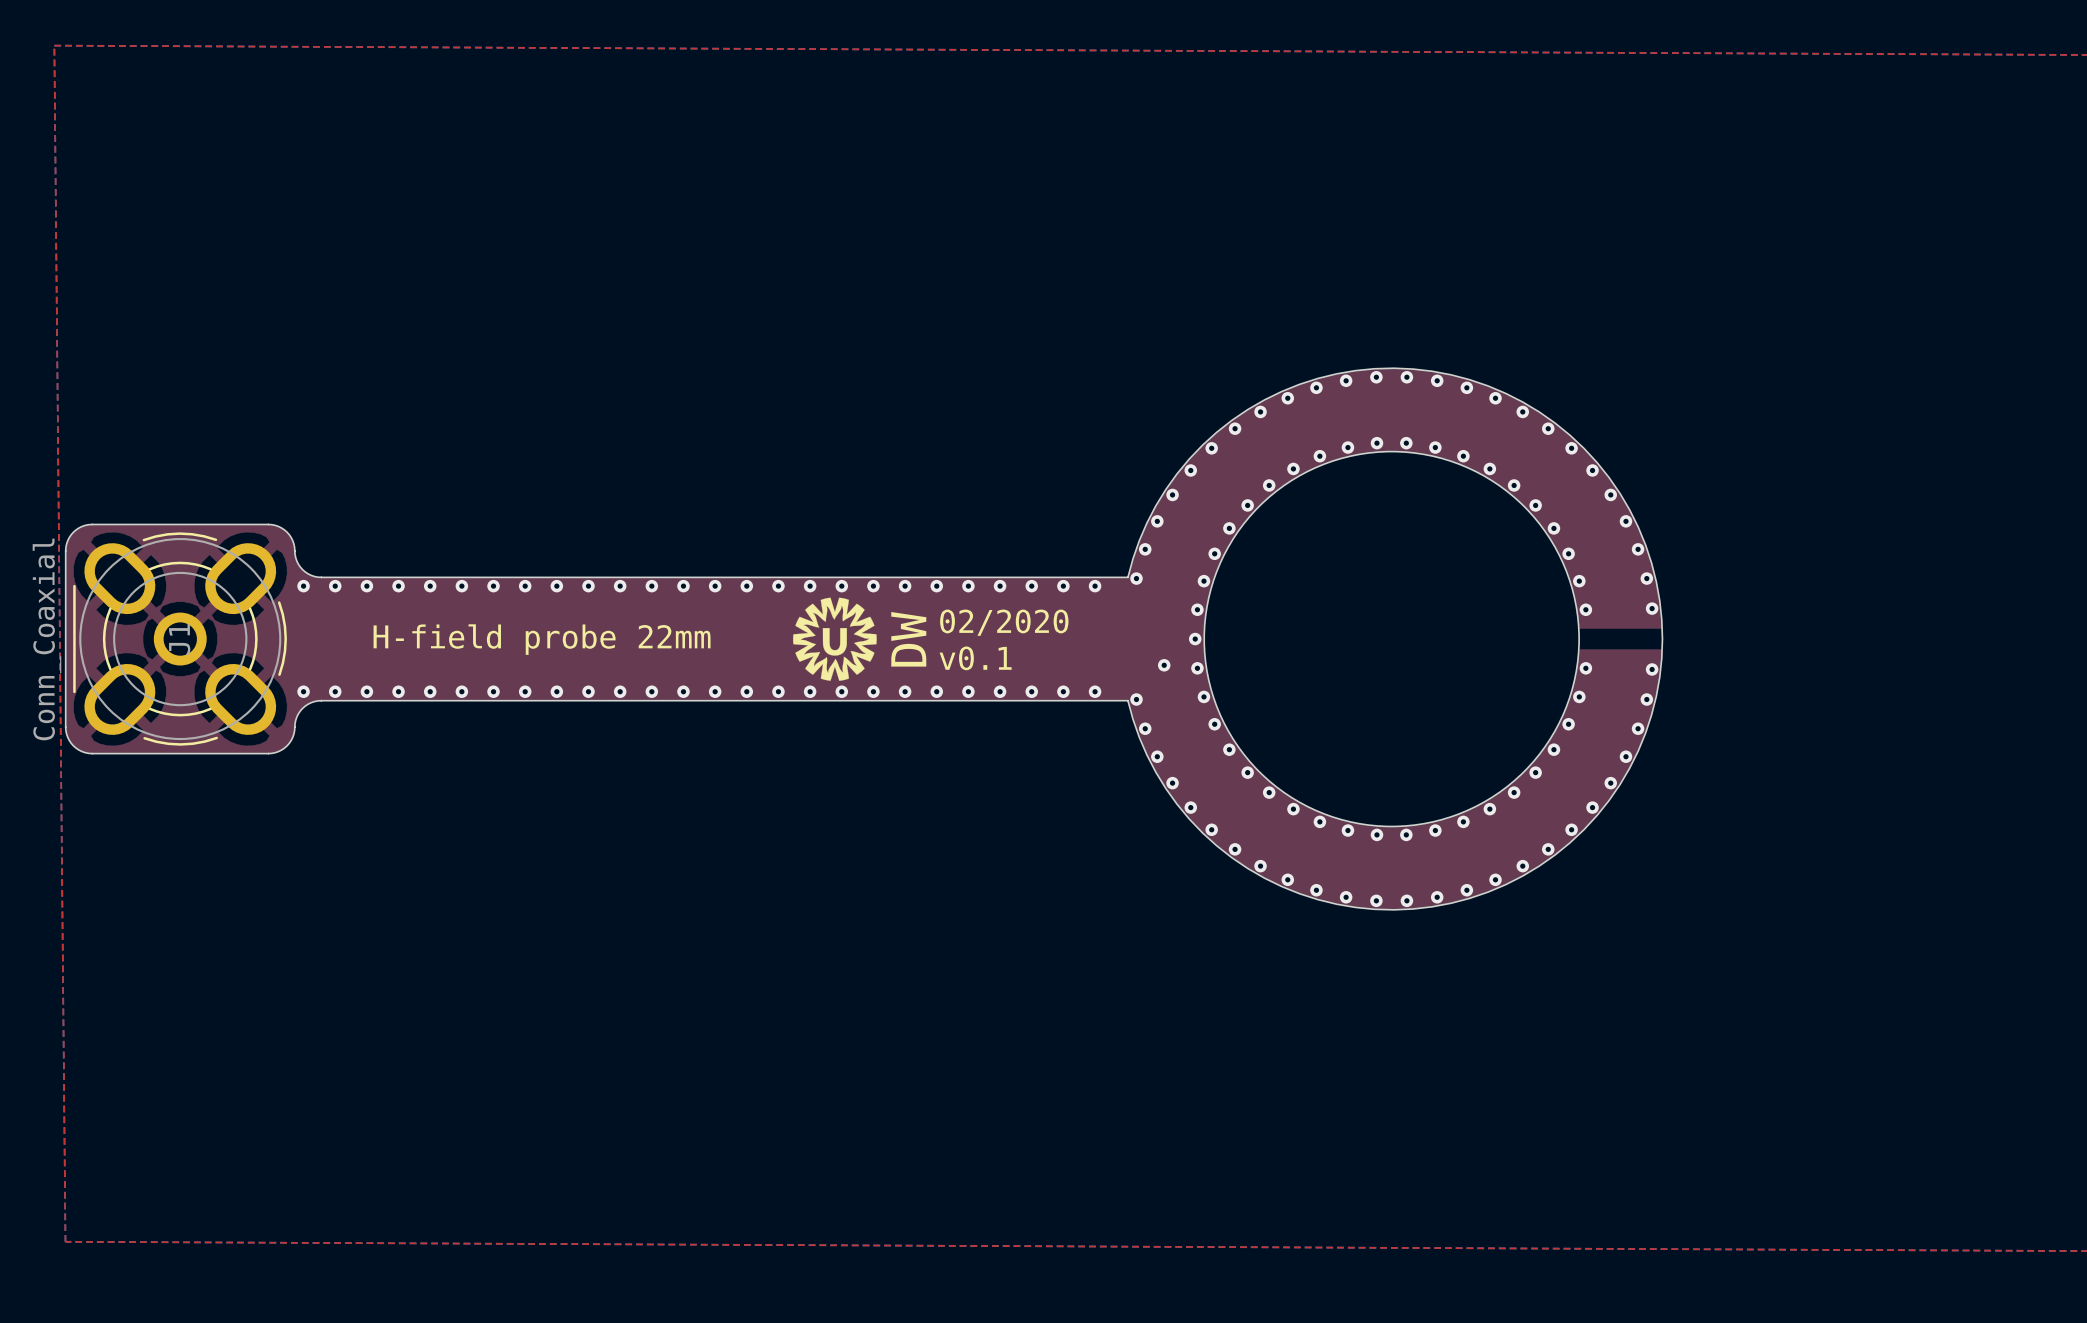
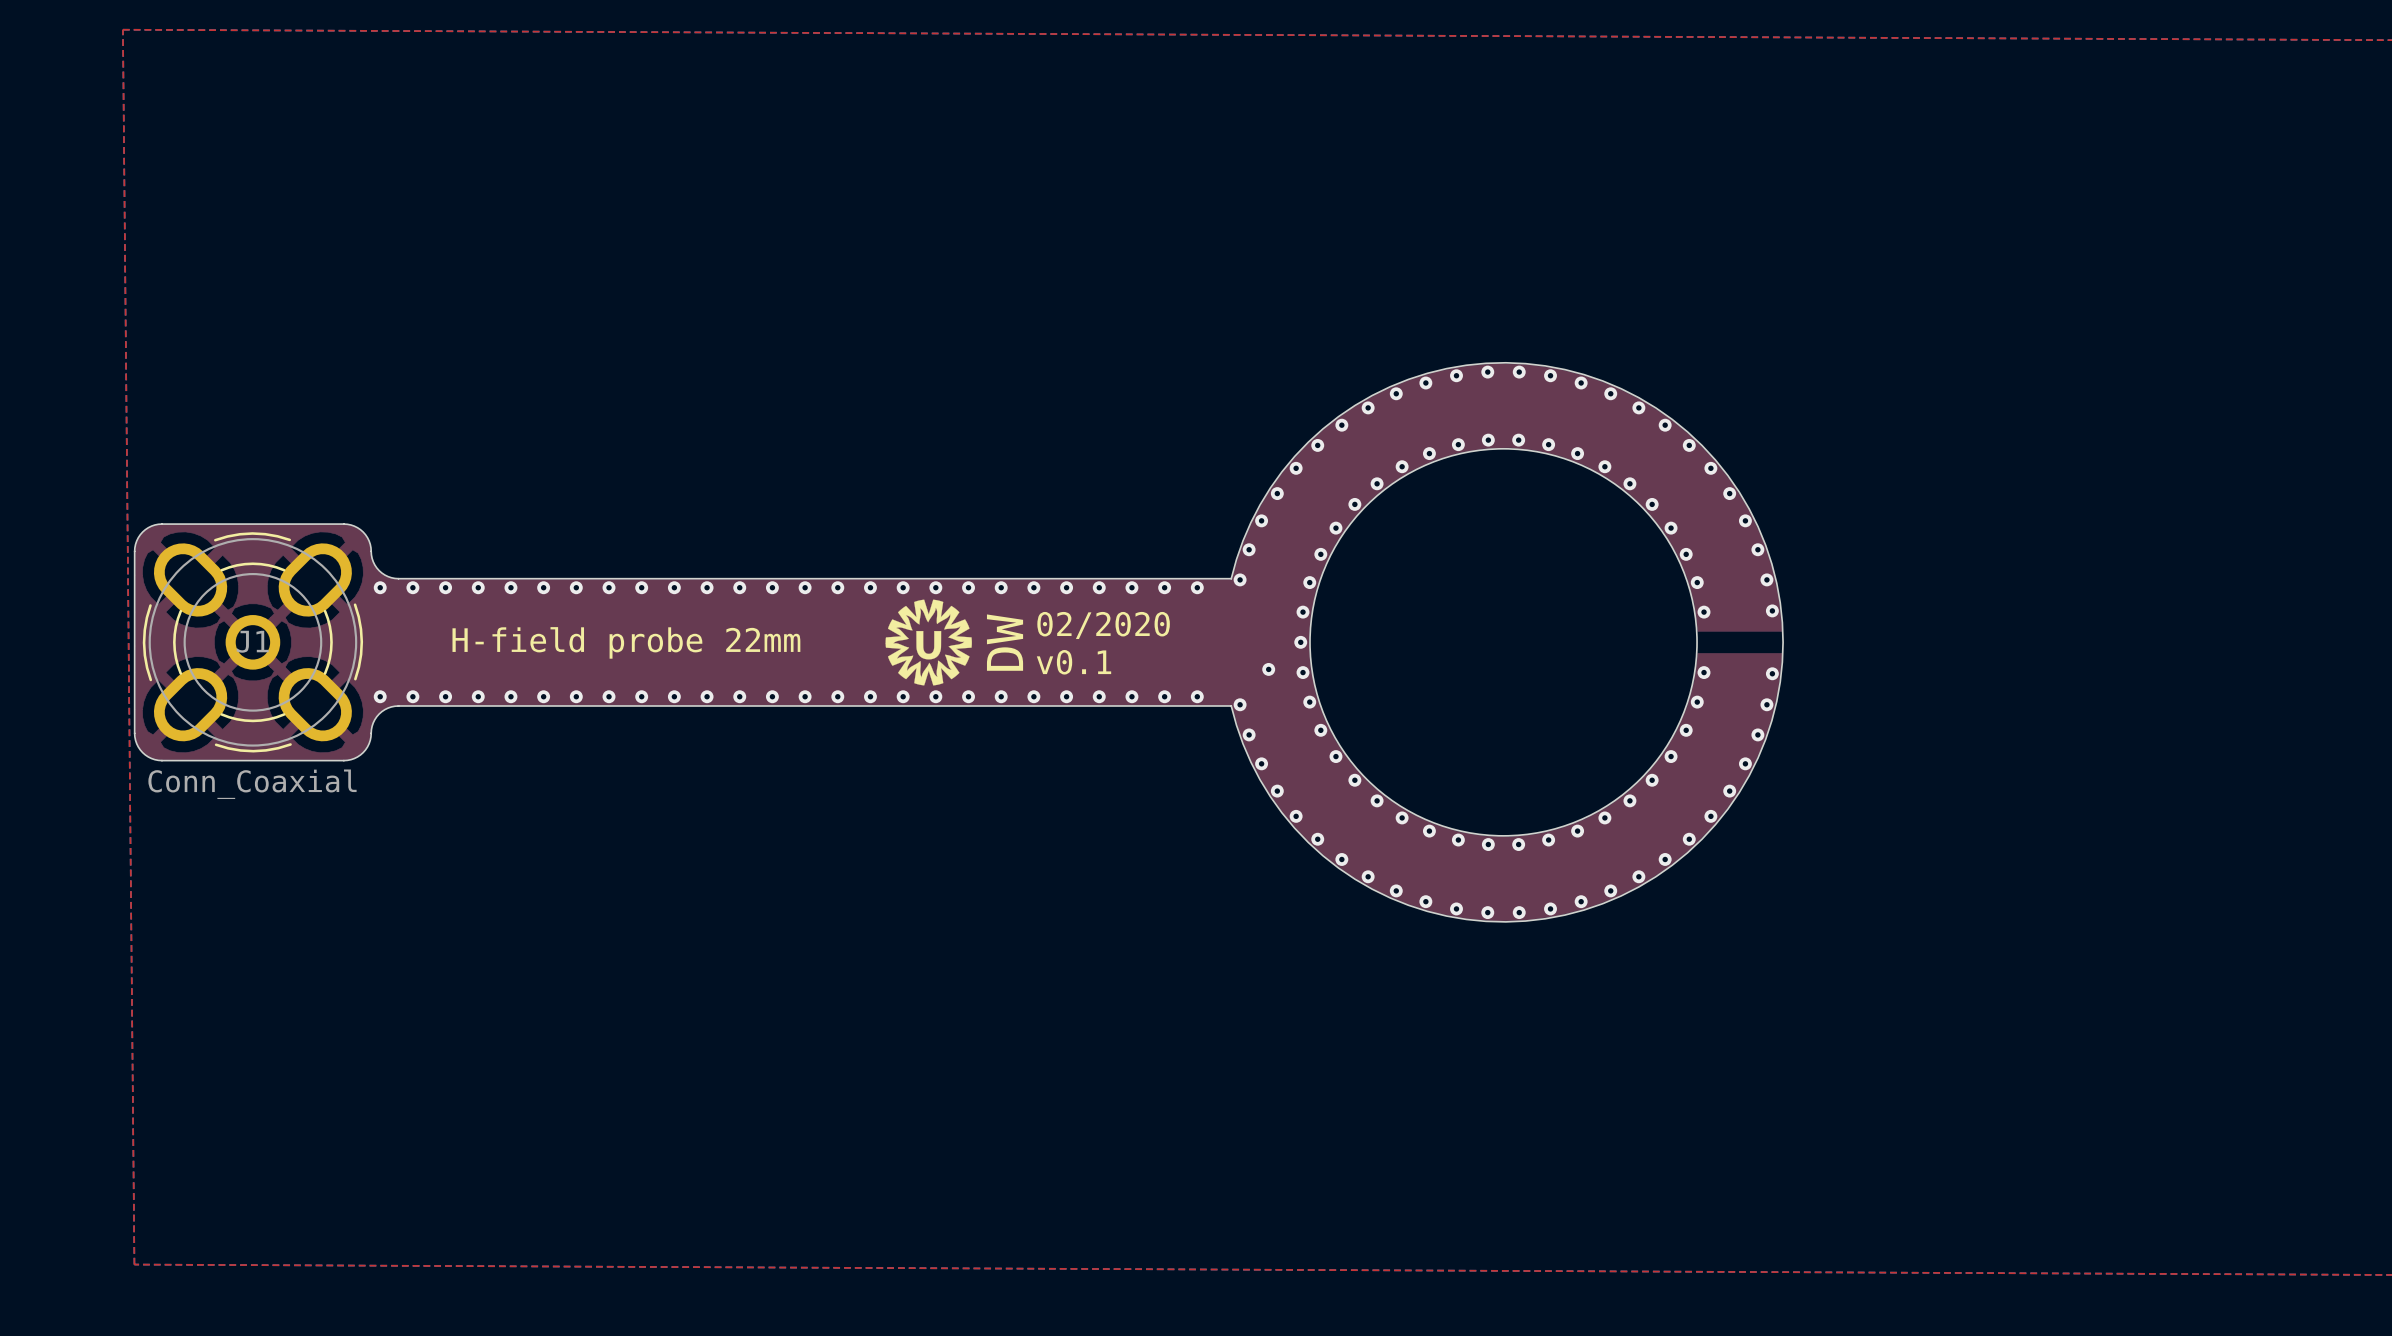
J1 footprint: [73, 532, 287, 746] -> [142, 532, 364, 753]
J1 value rotation: 0° (46, 639) -> 90° clockwise (252, 784)
J1 name rotation: 0° (179, 639) -> 90° clockwise (252, 641)

